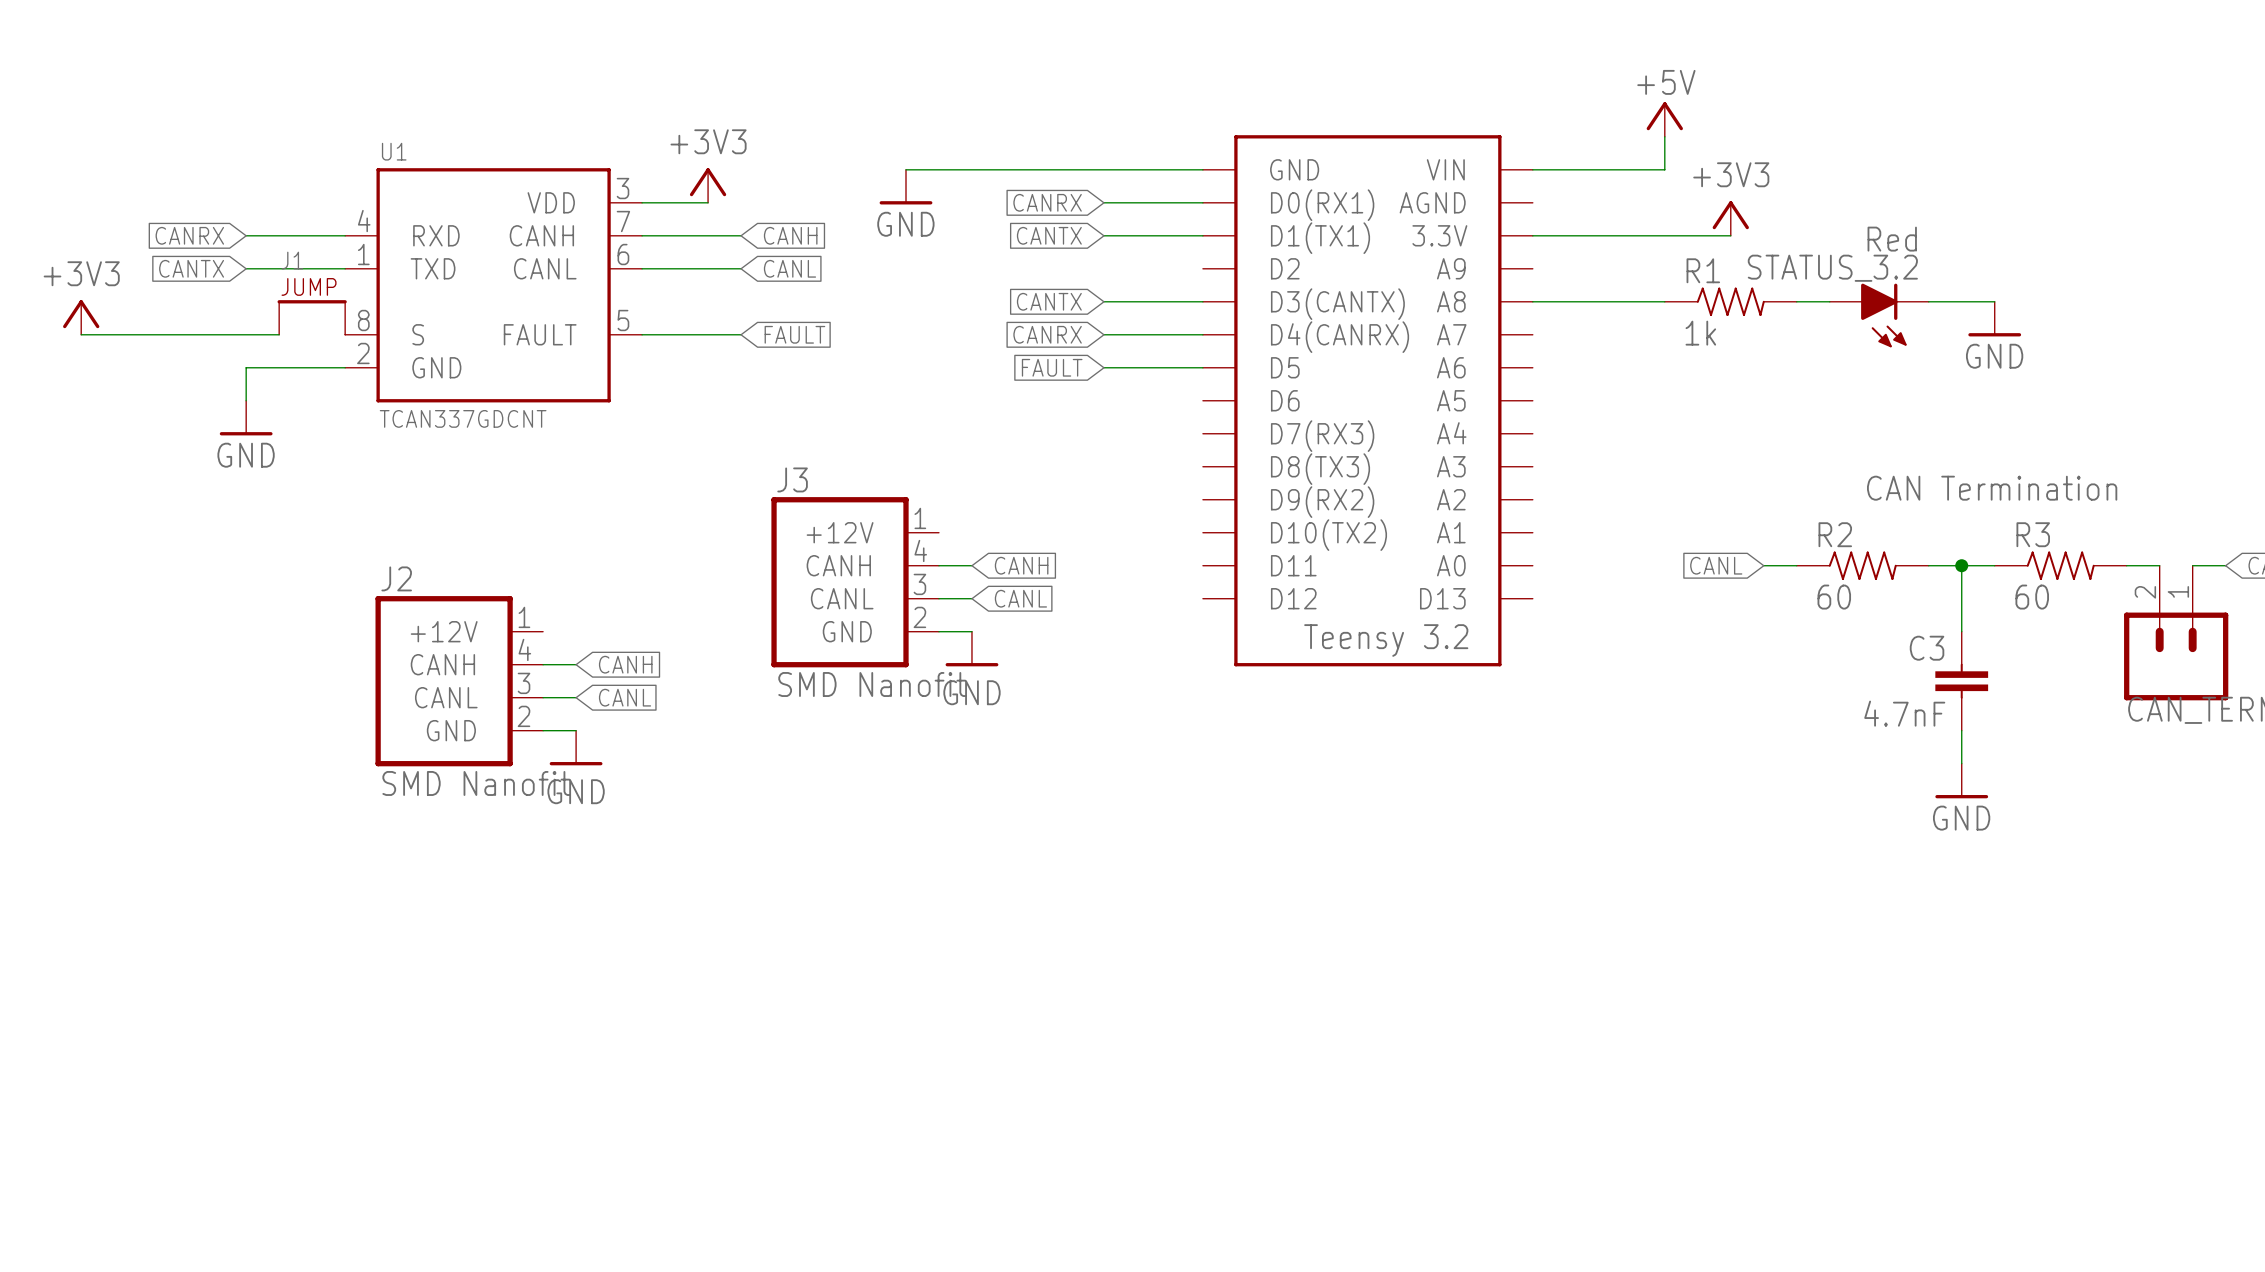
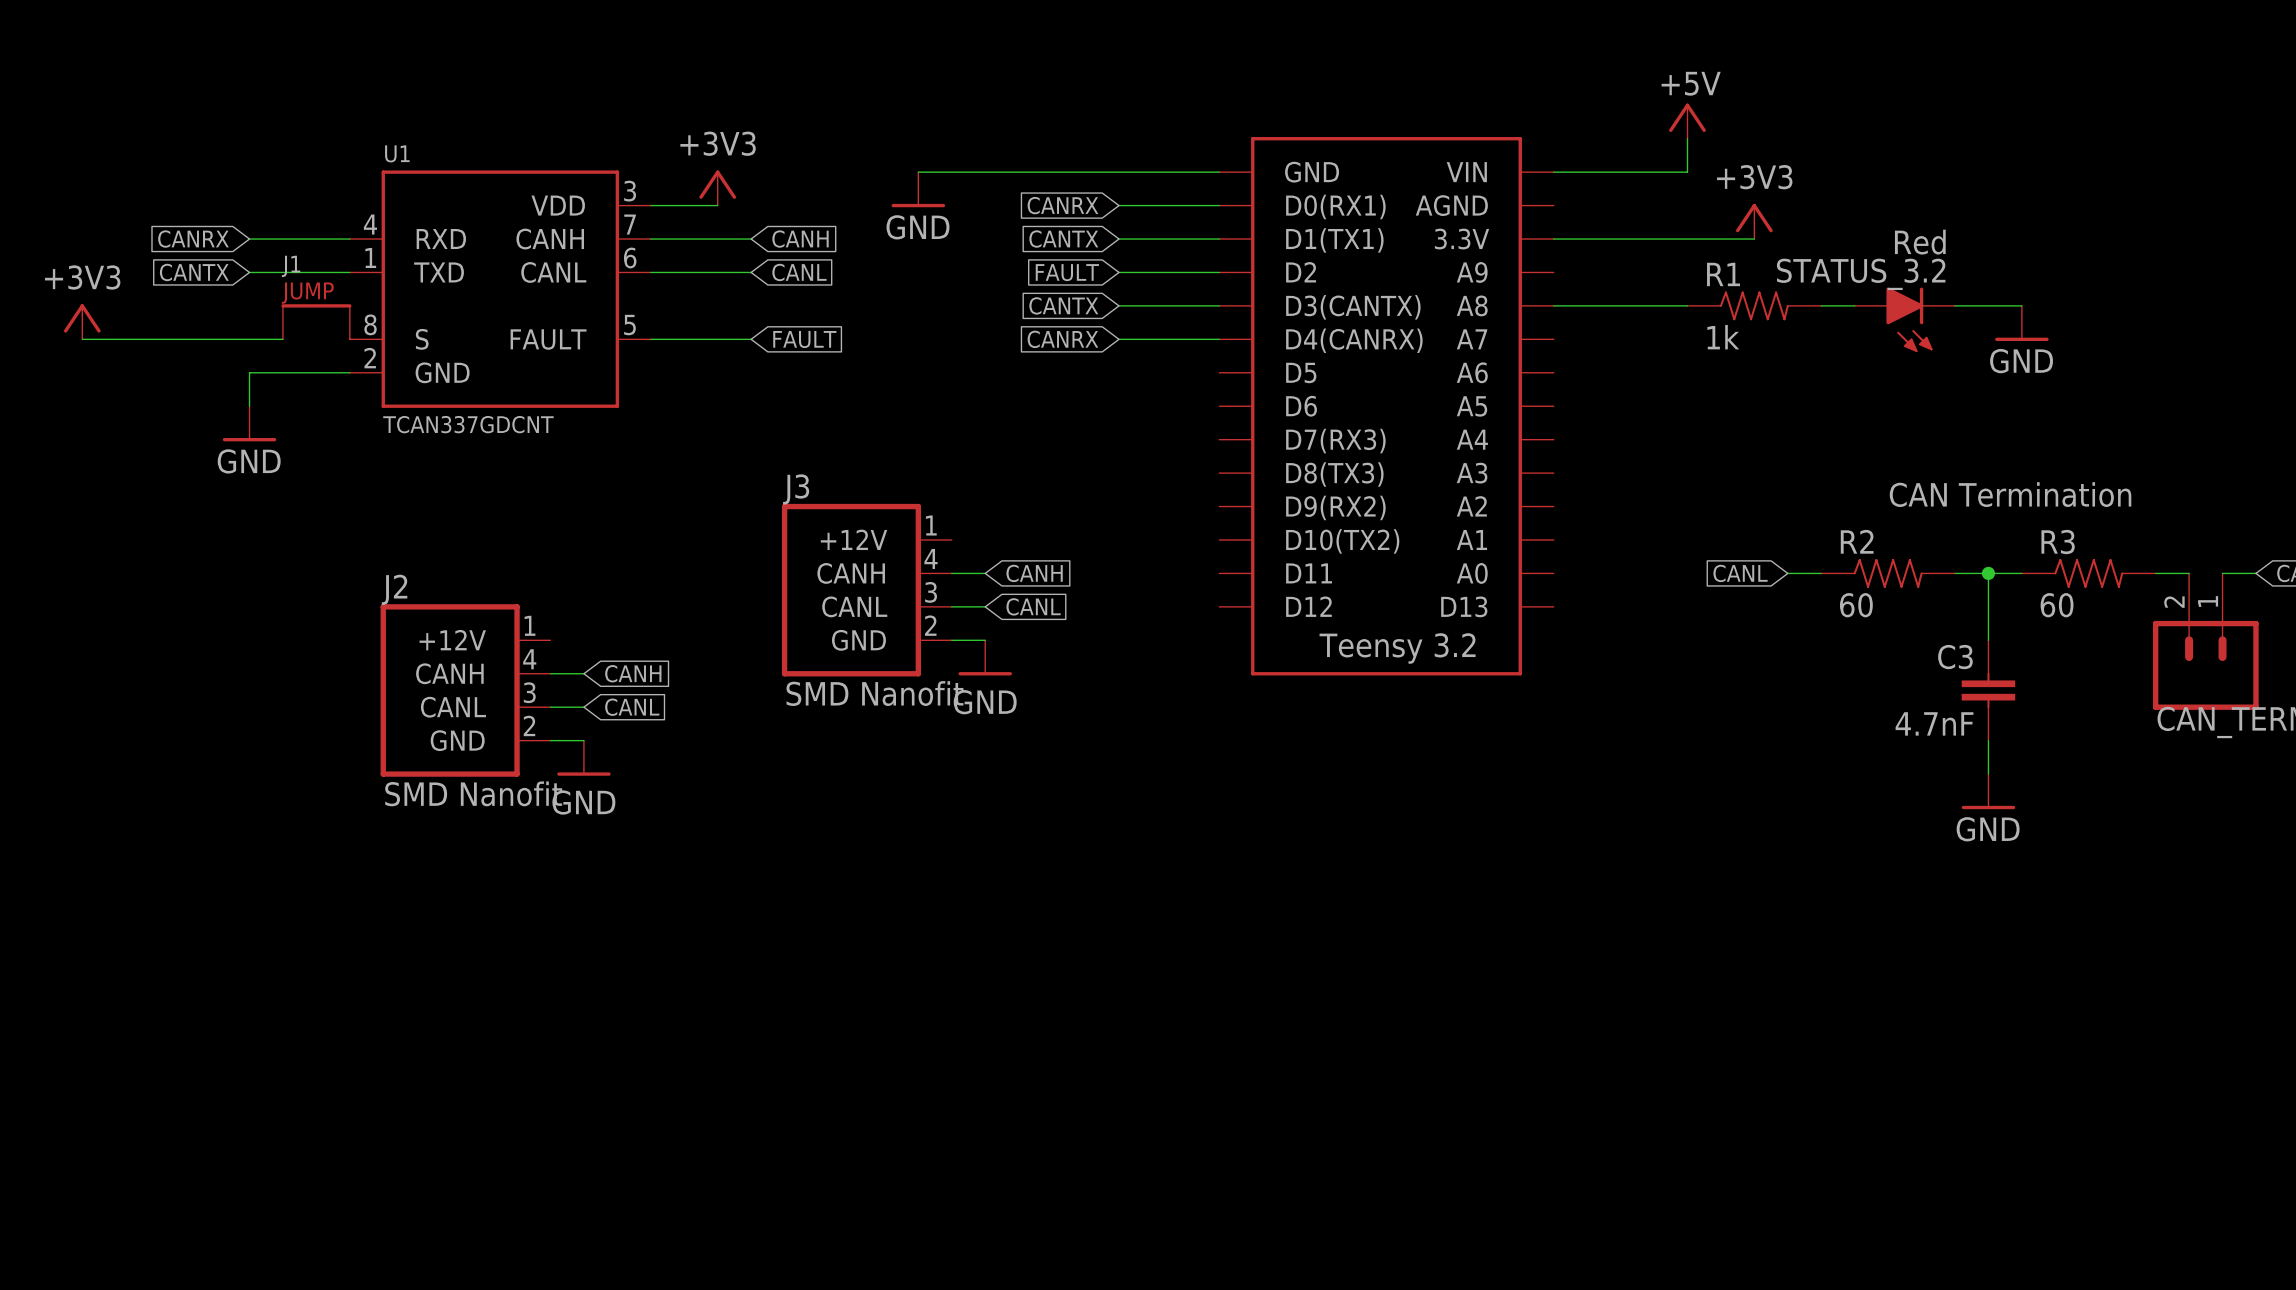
global label position: FAULT (1052, 367) -> FAULT (1067, 272)
wire: (1103, 367) (1202, 367) -> (1118, 272) (1219, 272)

